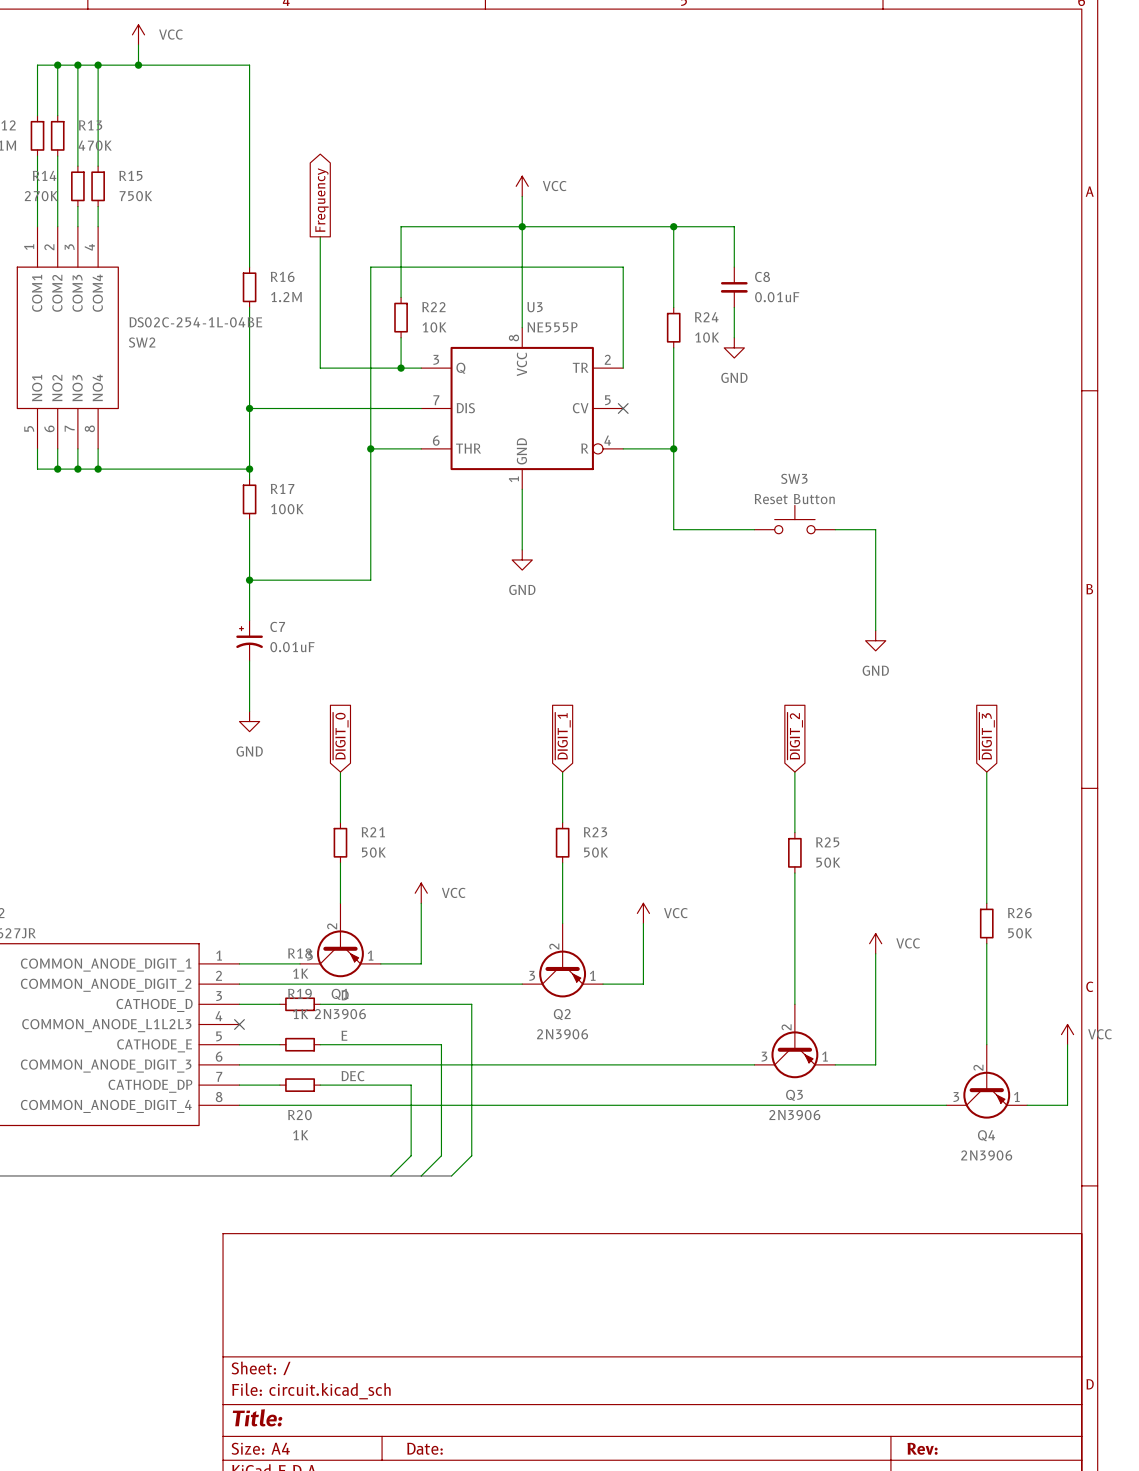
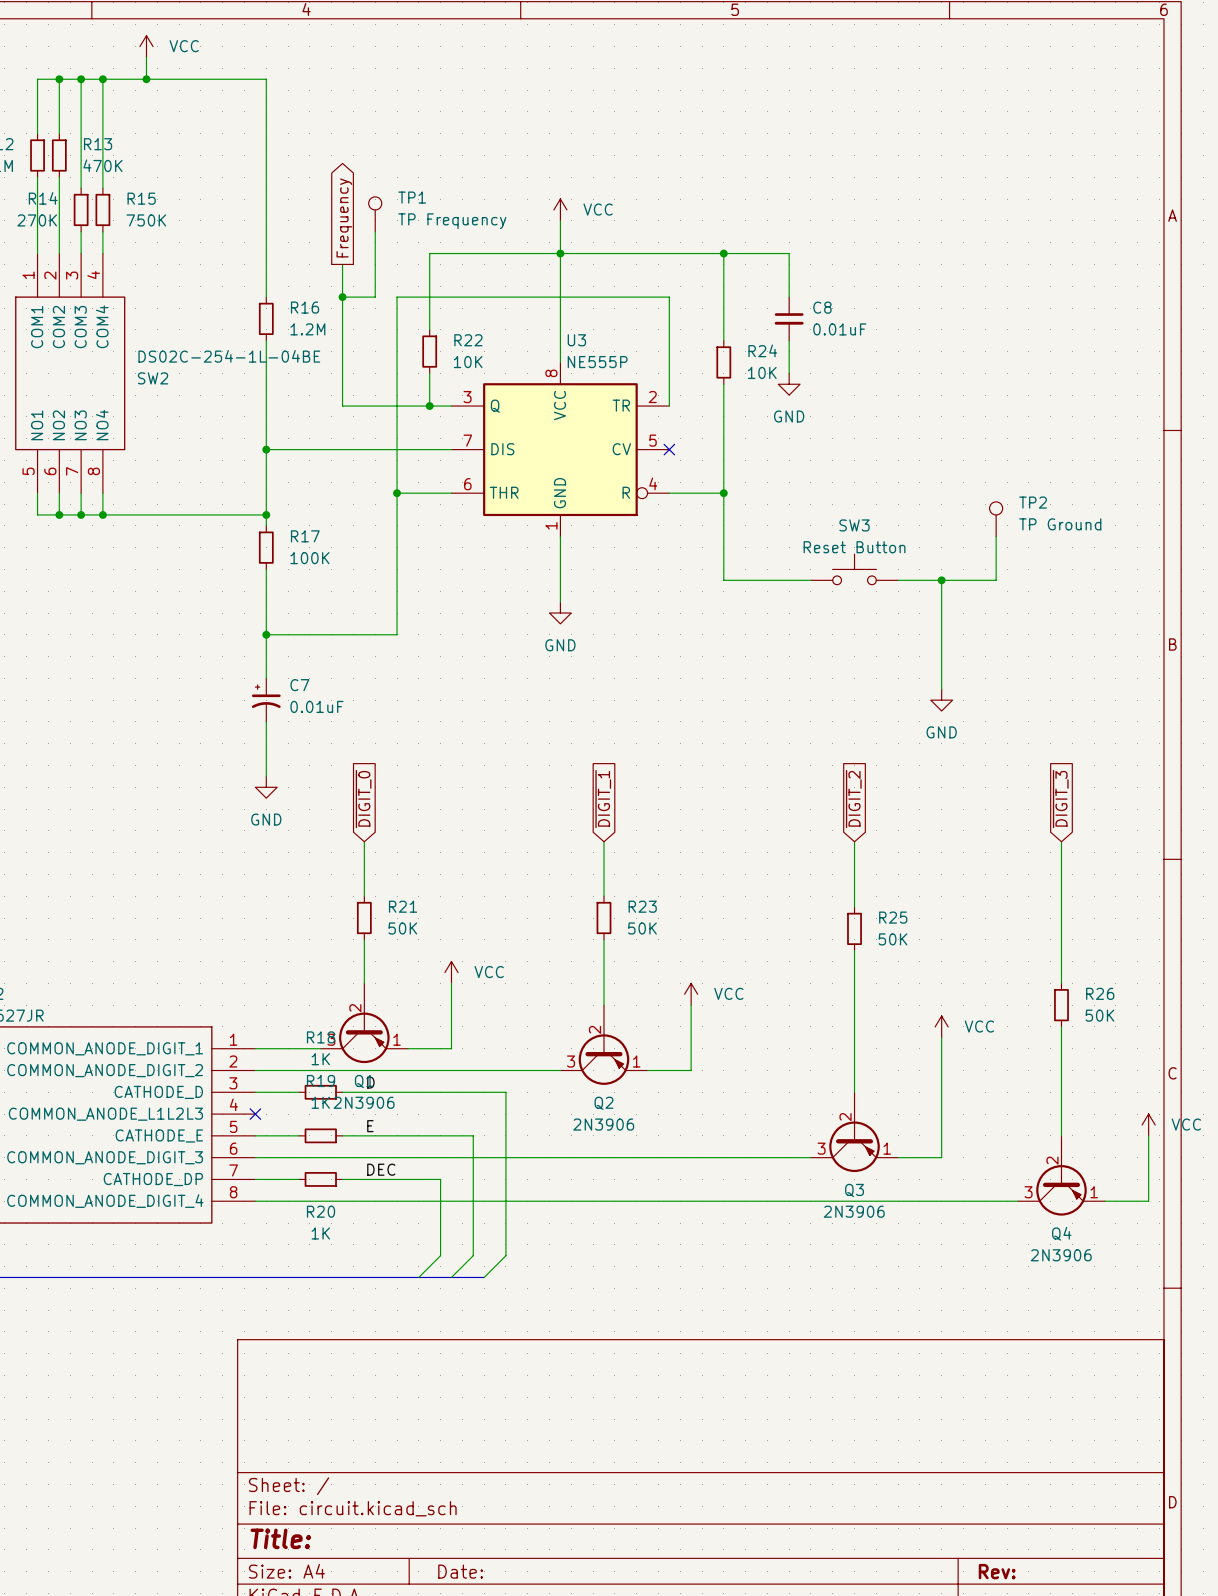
TP1: none -> TP Frequency (375, 214)
wire: none -> (375, 231) (375, 297) (342, 297)
junction: none -> (342, 297)
TP2: none -> TP Ground (996, 519)
wire: none -> (996, 536) (996, 580) (941, 580)
junction: none -> (941, 580)

